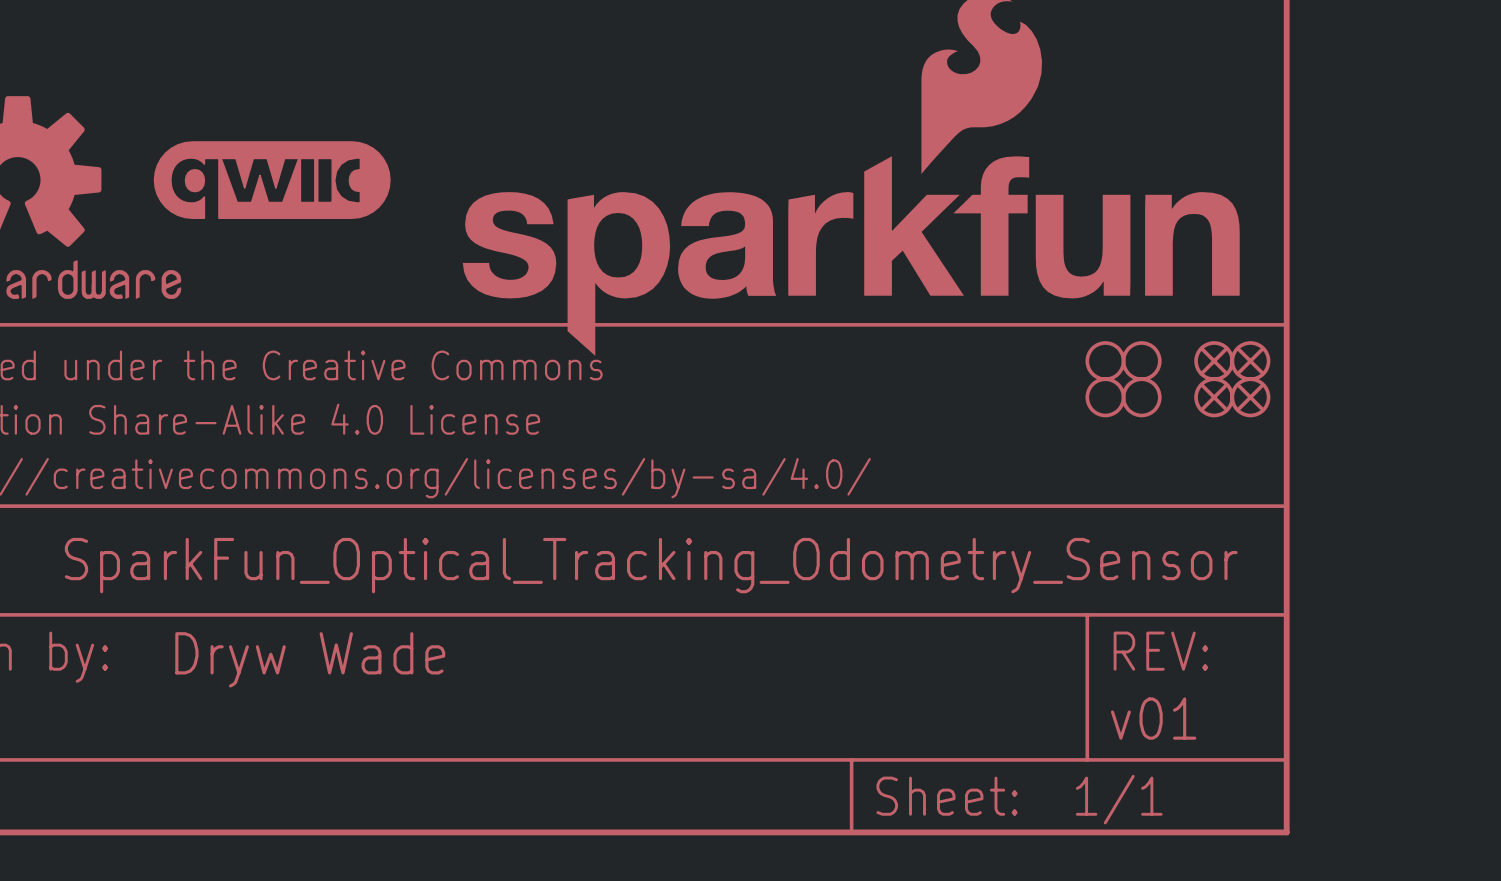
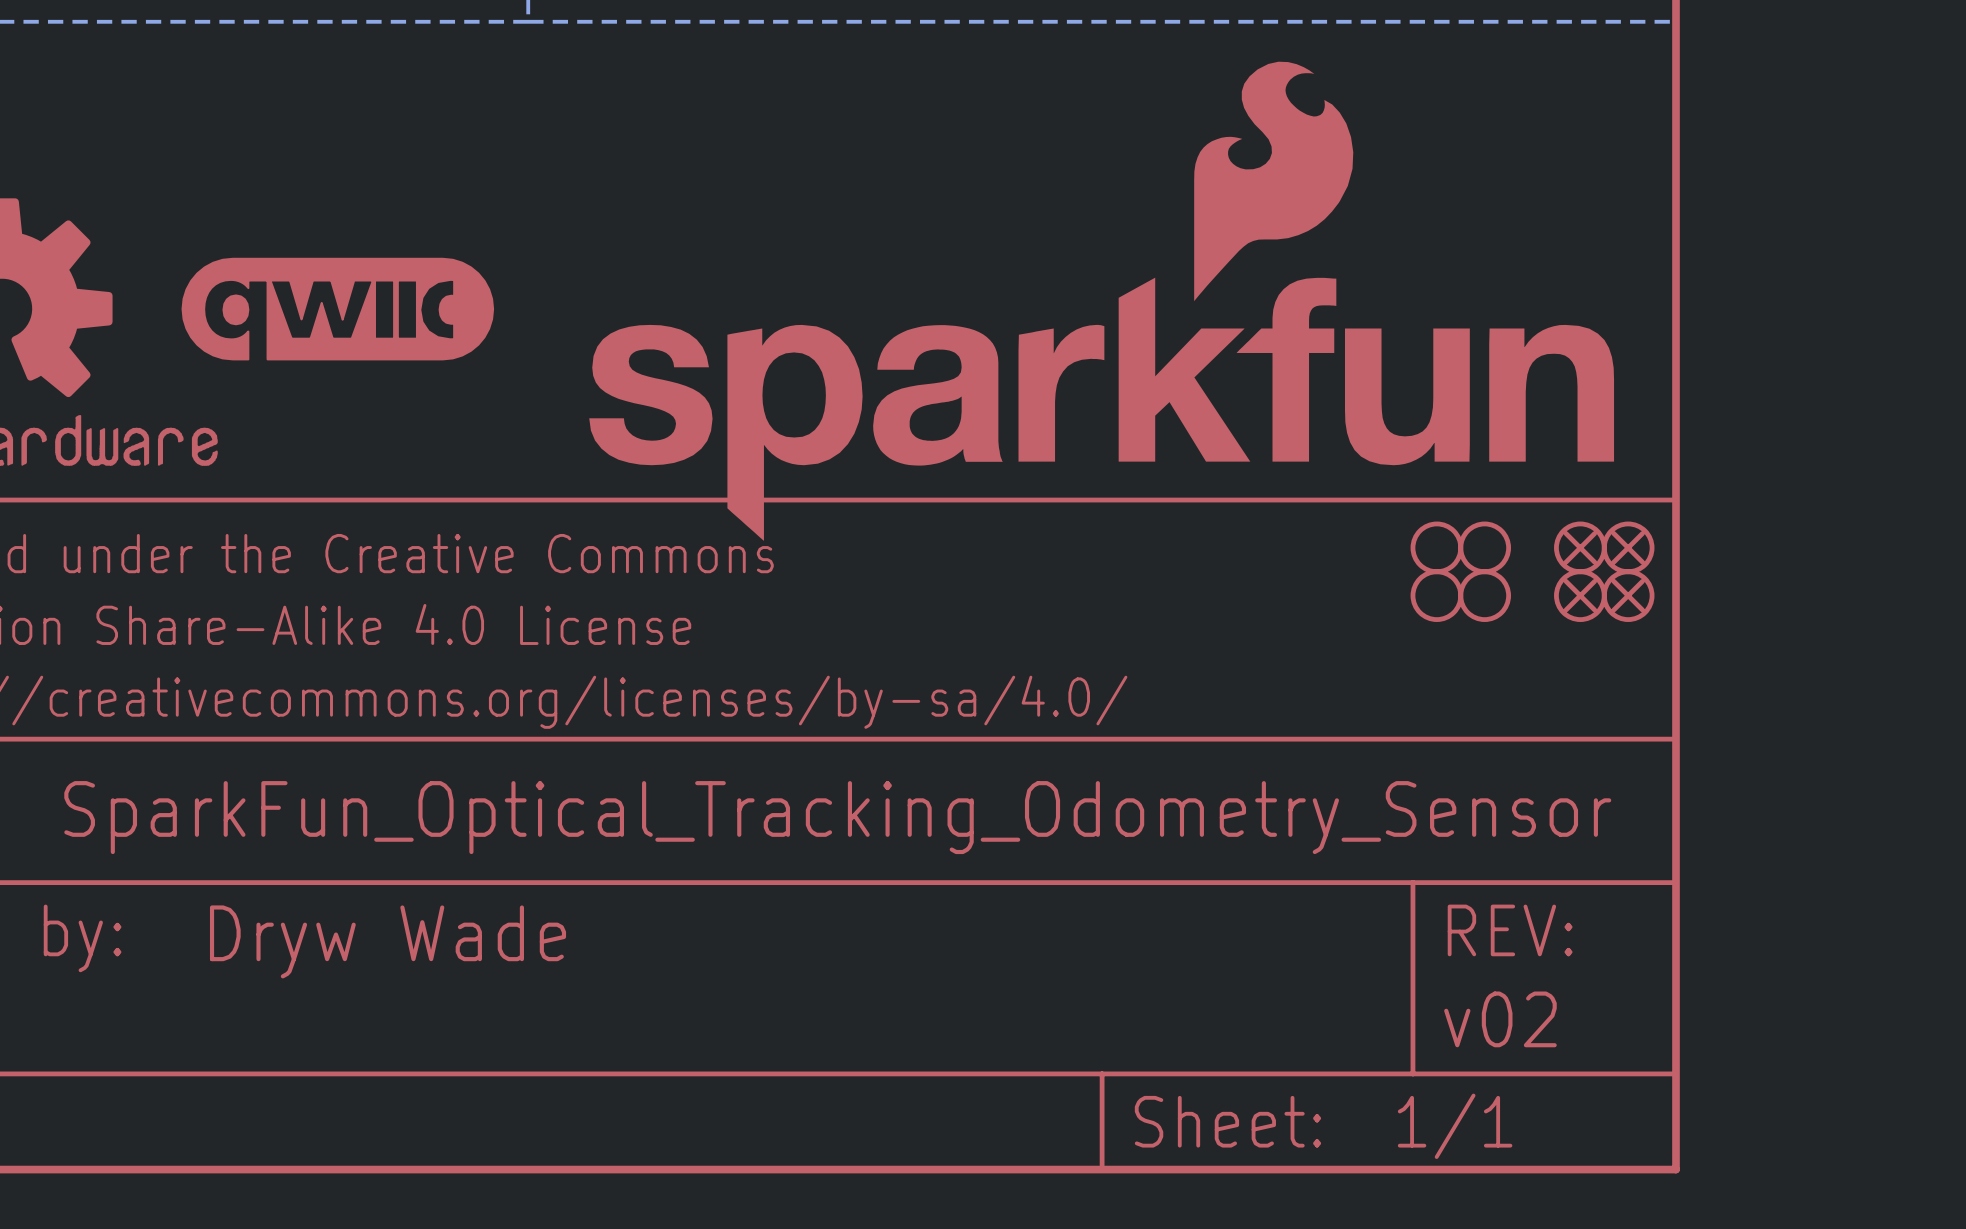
part text: v01 (1153, 718) -> v02 (1500, 1019)

